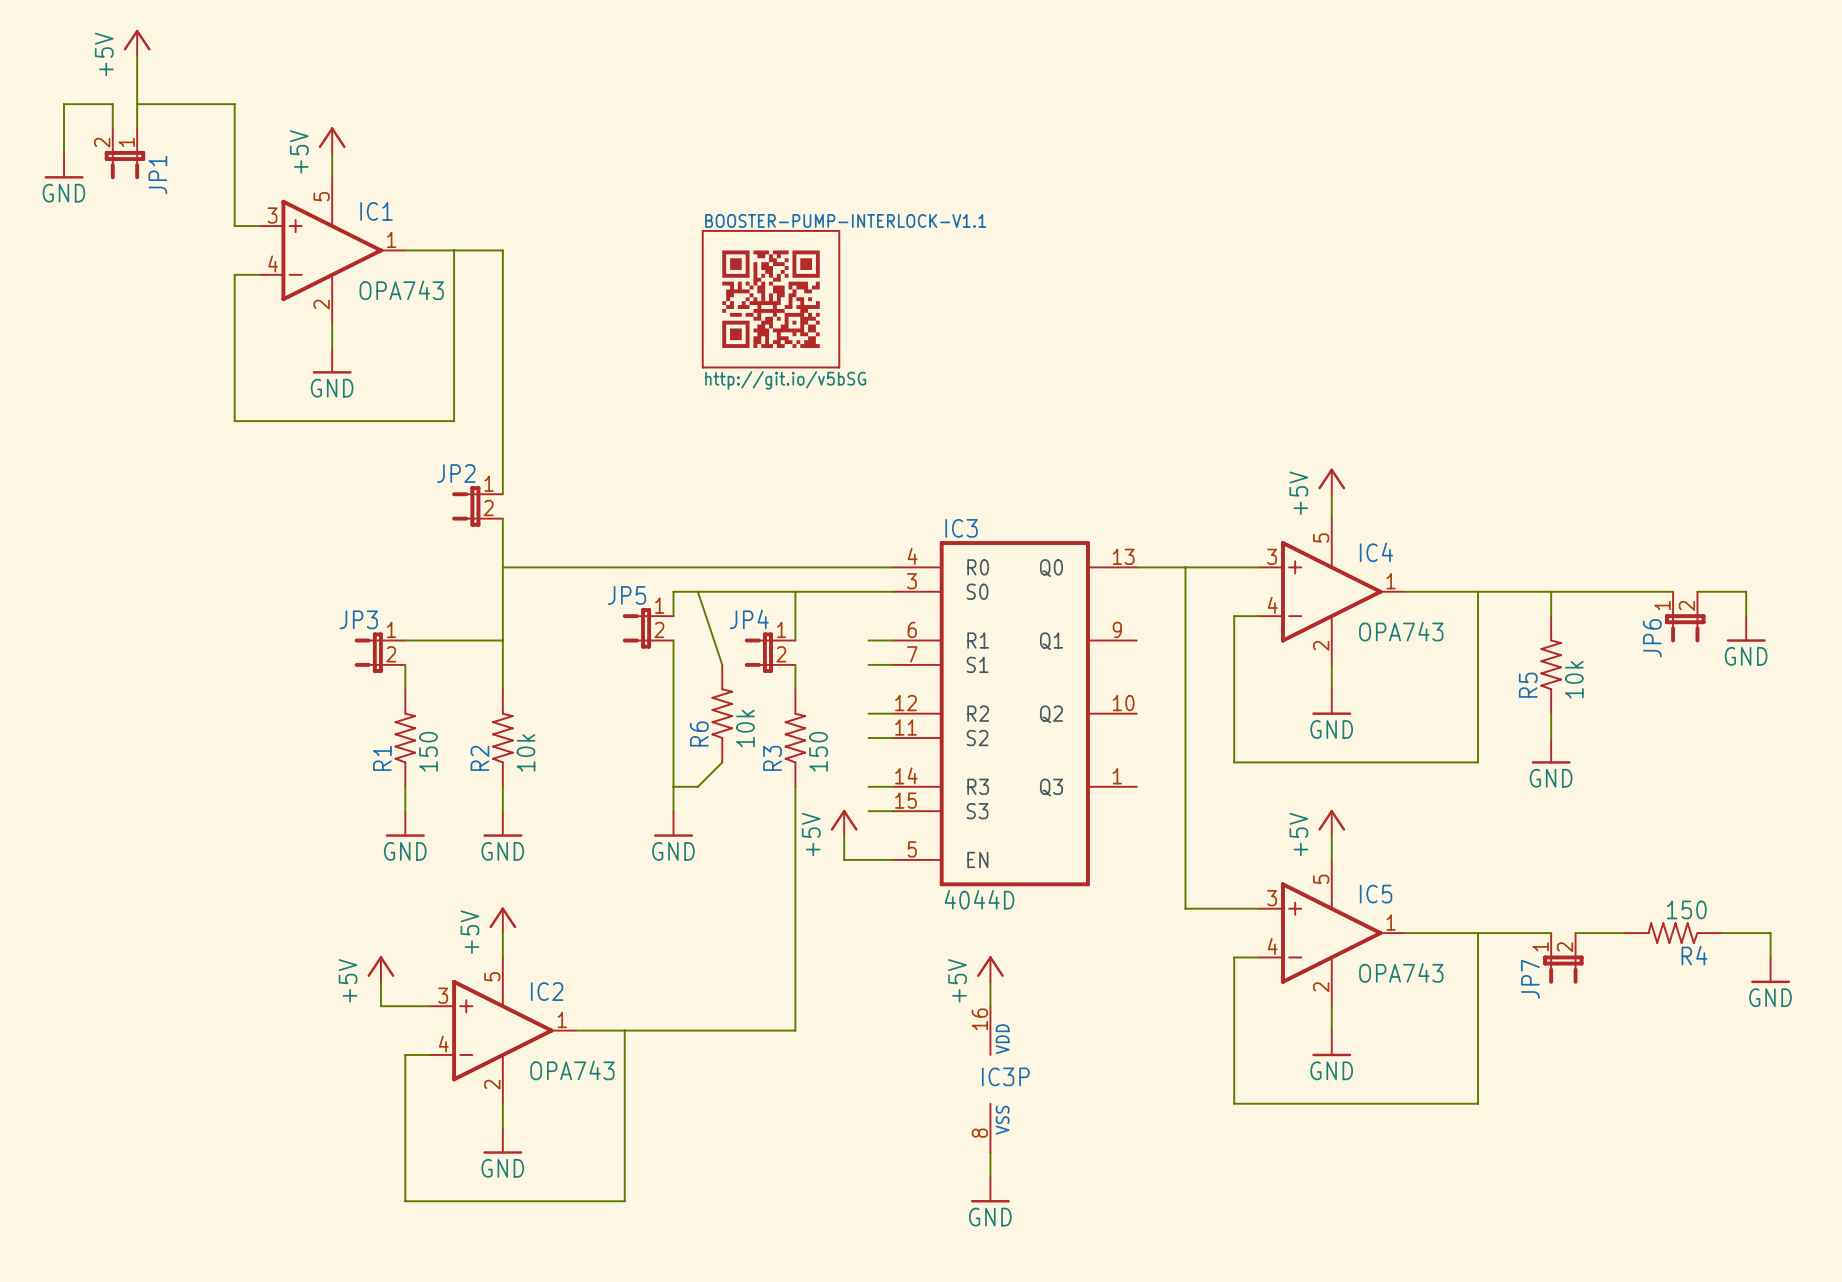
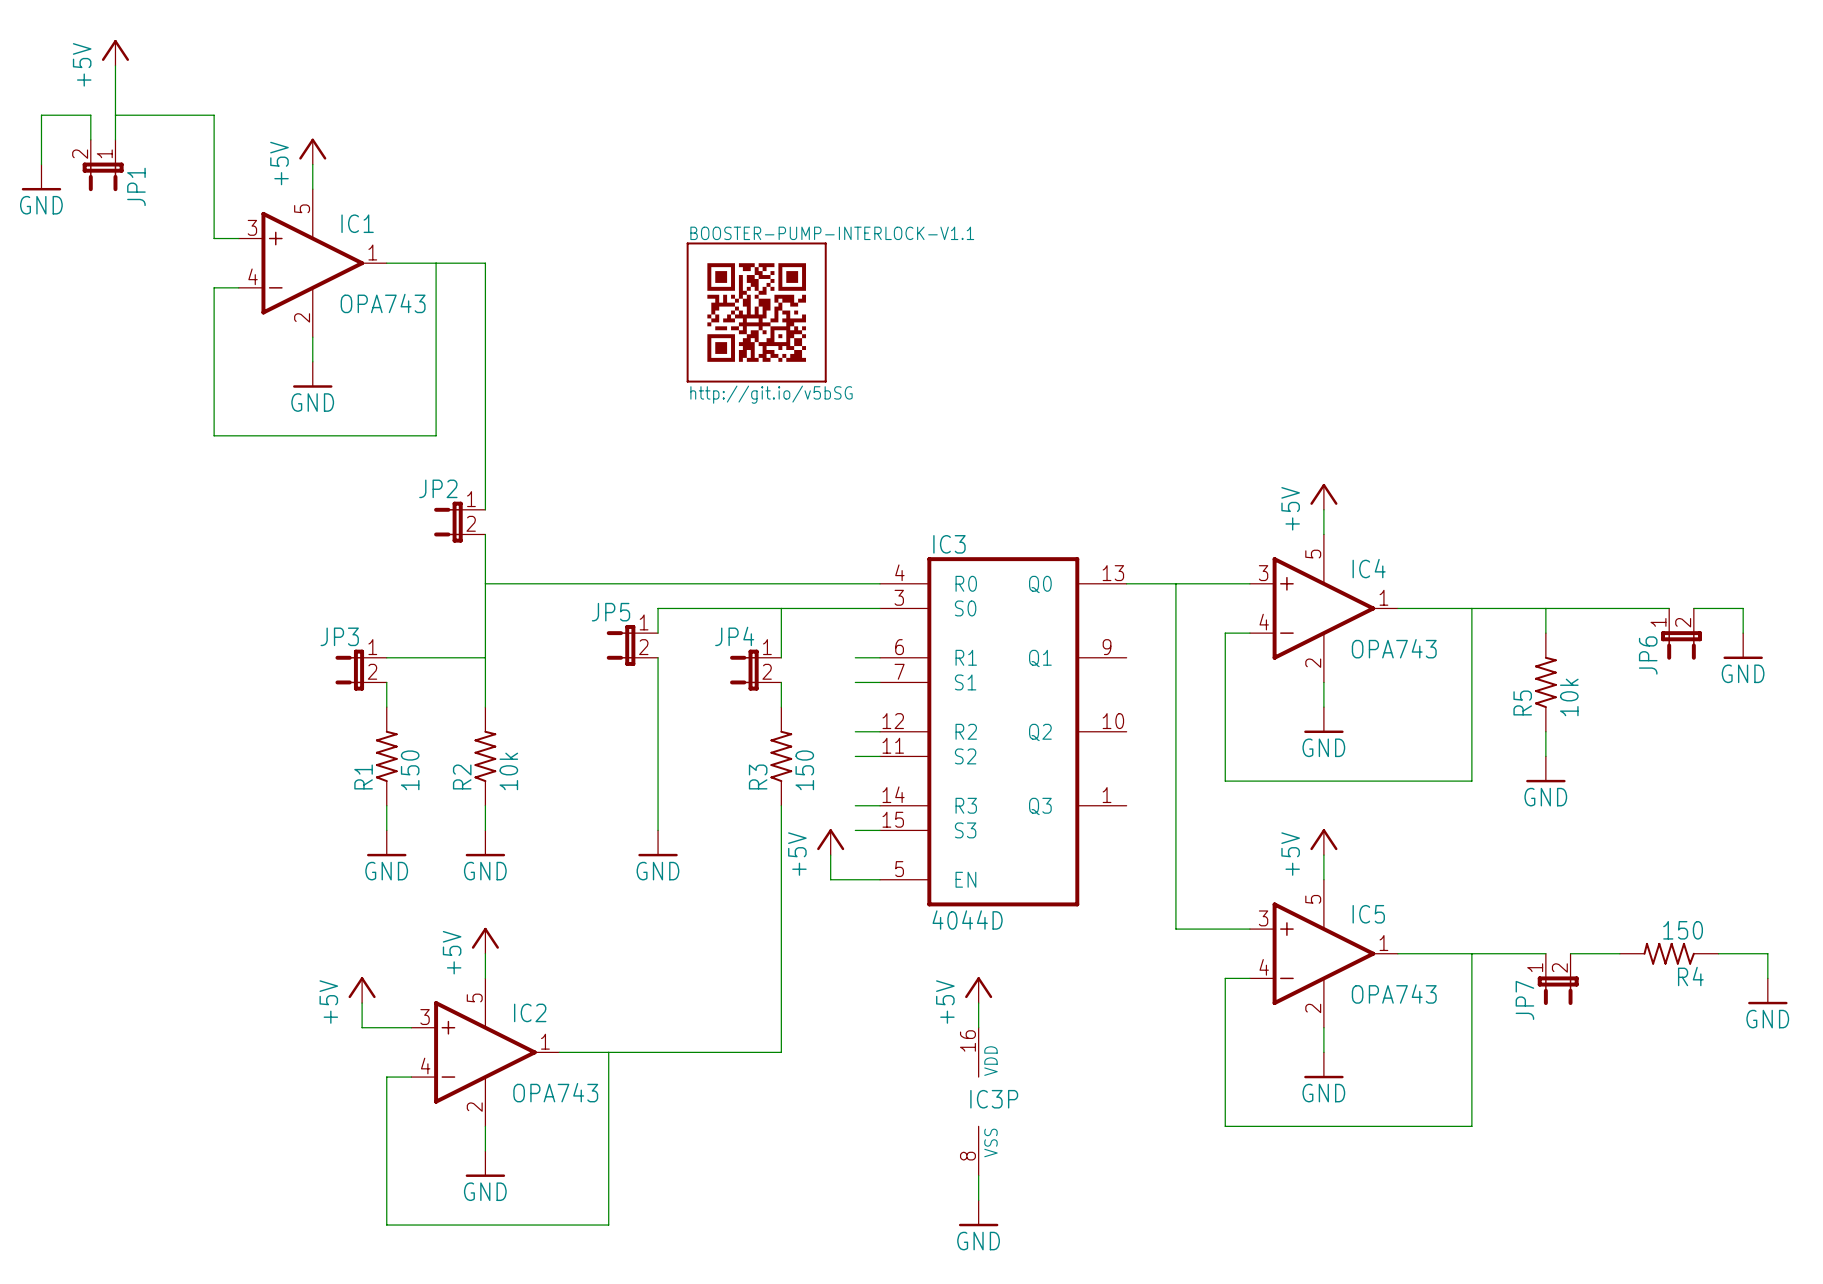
wire: (697, 591) (722, 664) -> none
R6: 10k (722, 713) -> none
wire: (722, 762) (697, 786) (673, 786) -> none

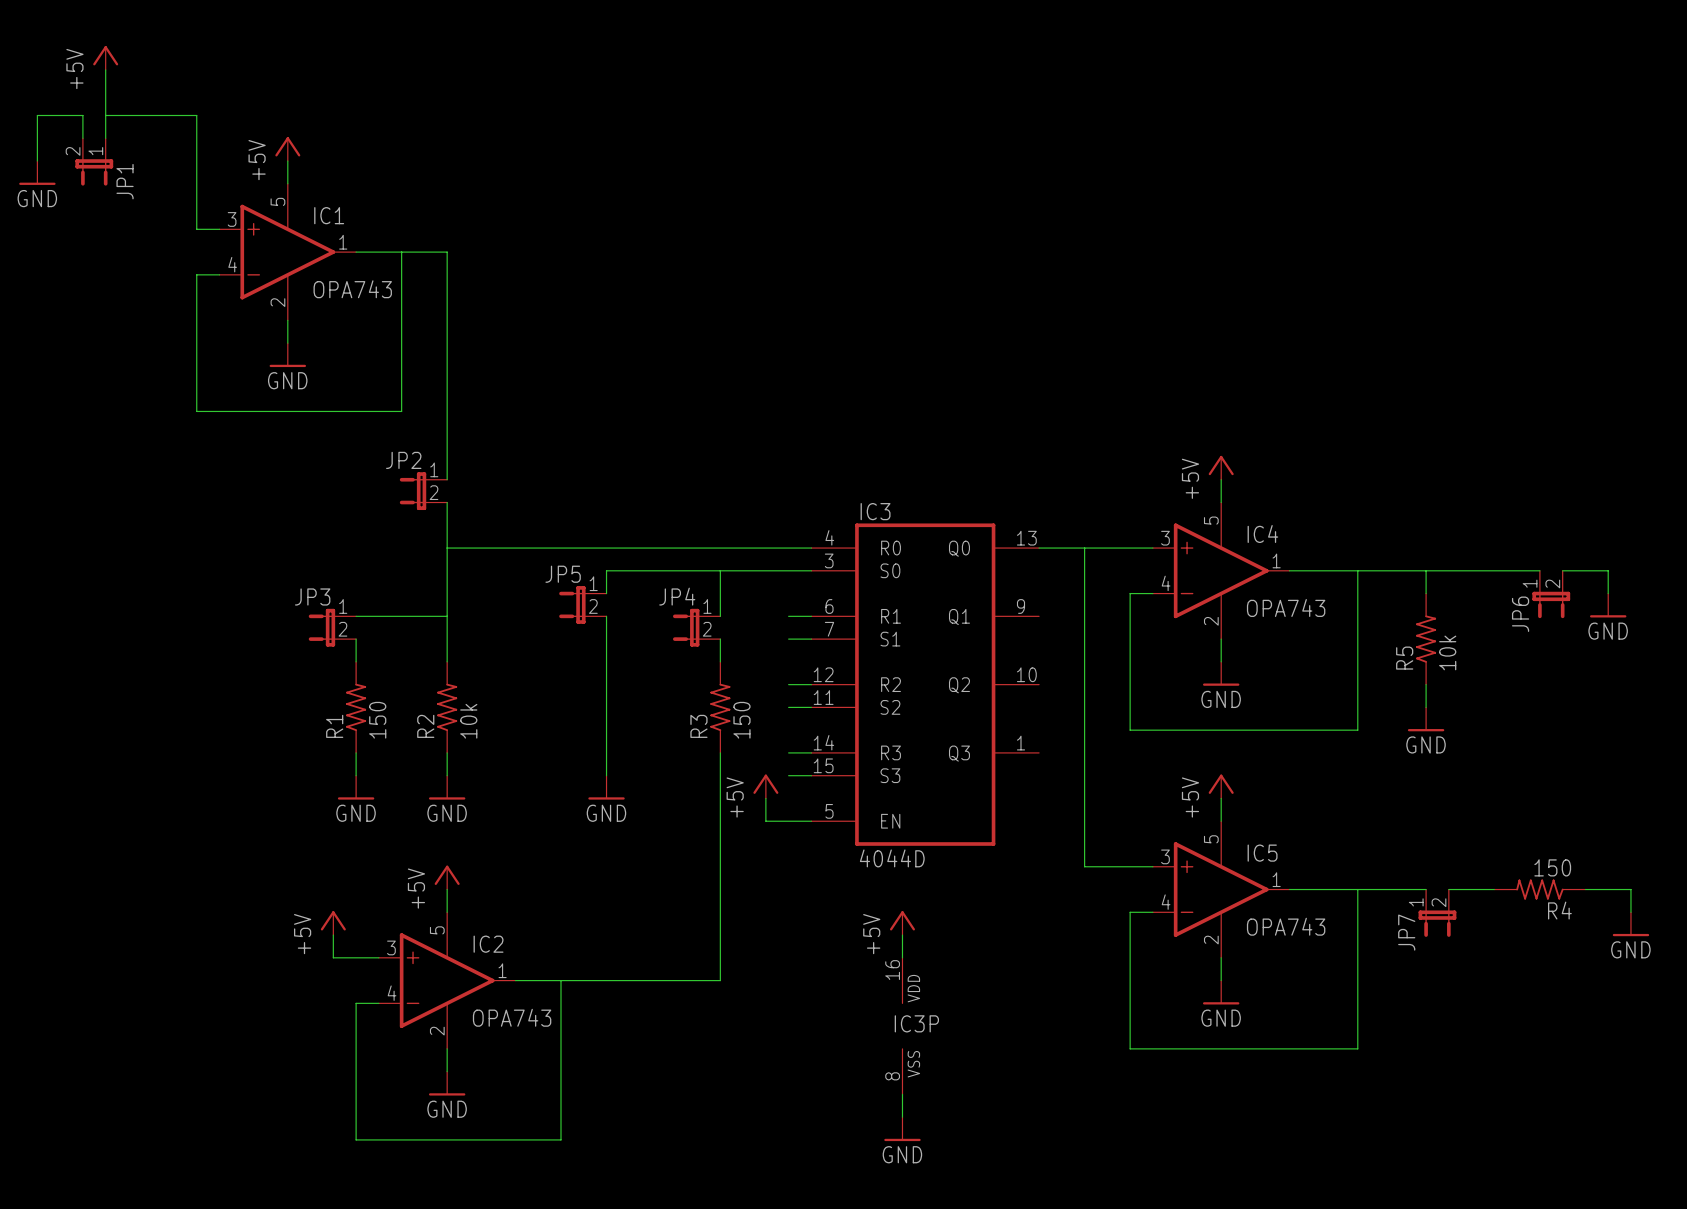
BOOSTER-PUMP-INTERLOCK-V1.1: (756, 312) -> none

